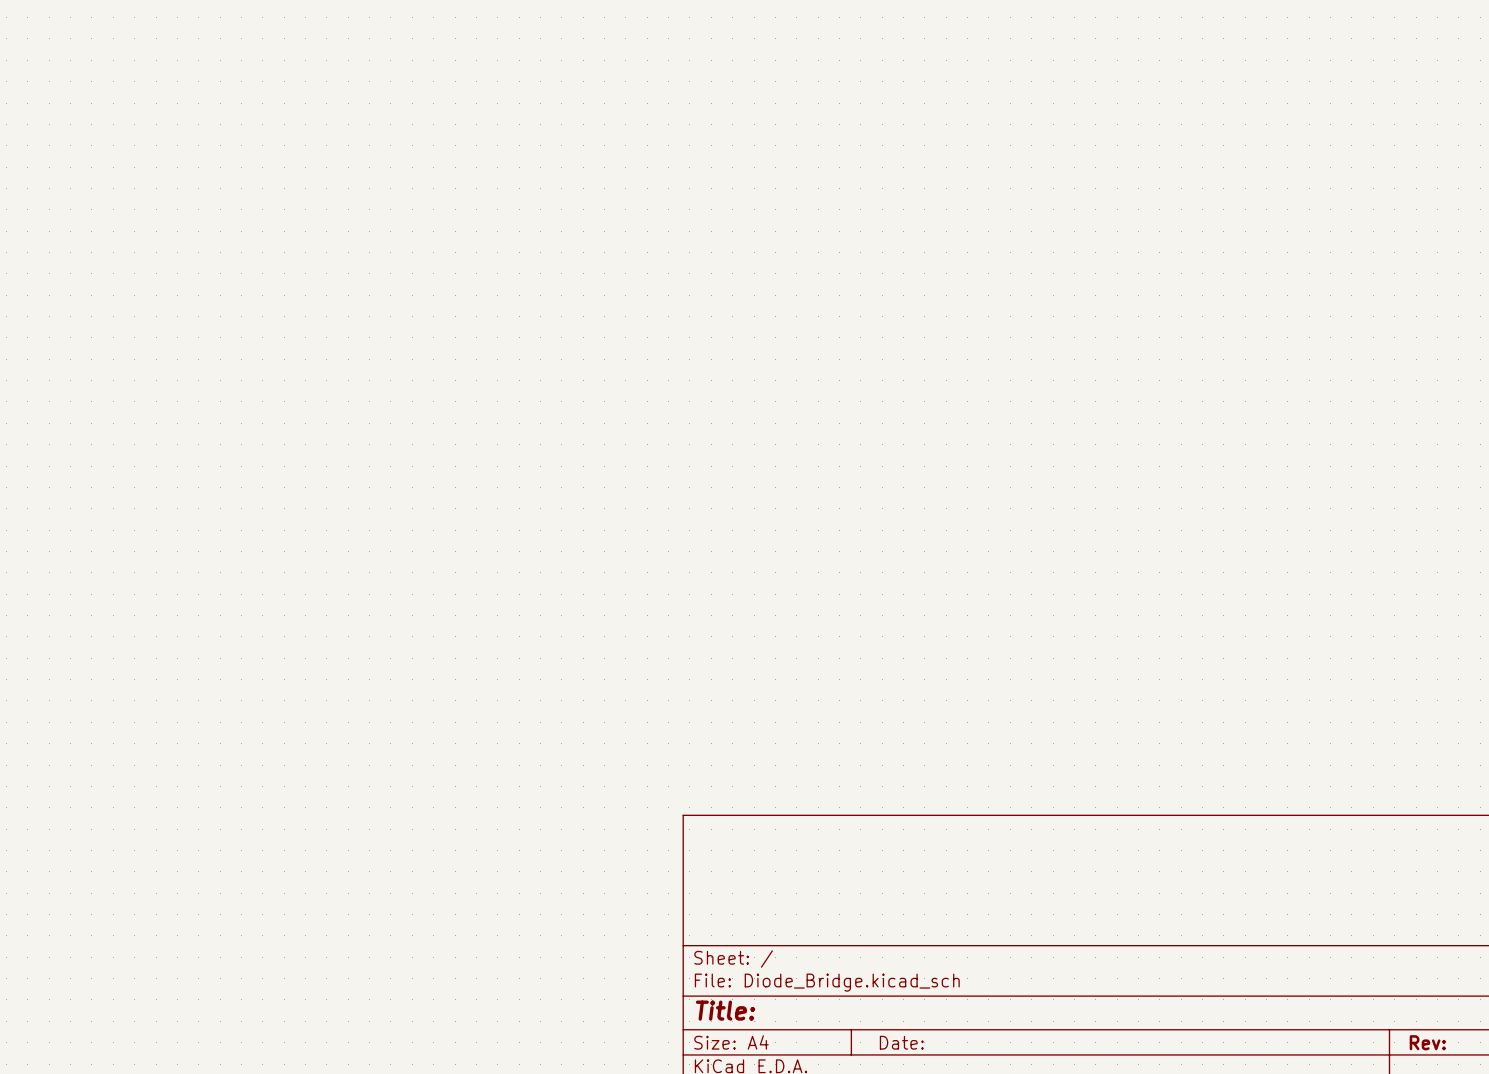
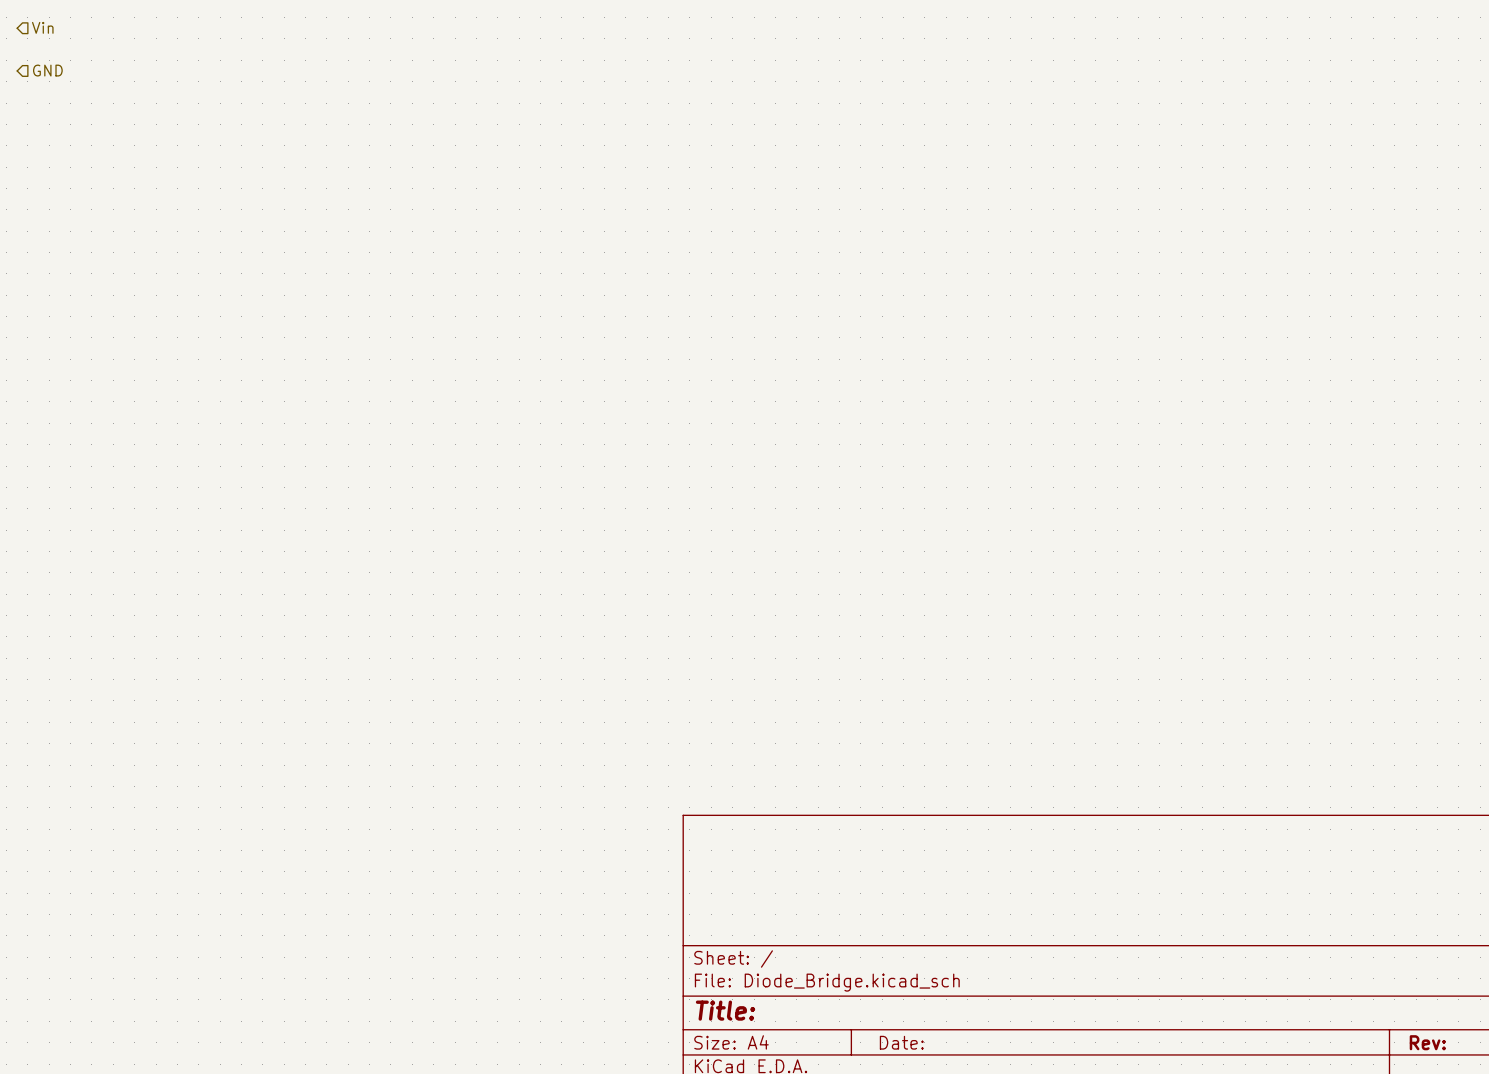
hierarchical label: none -> Vin (42, 27)
hierarchical label: none -> GND (47, 70)

